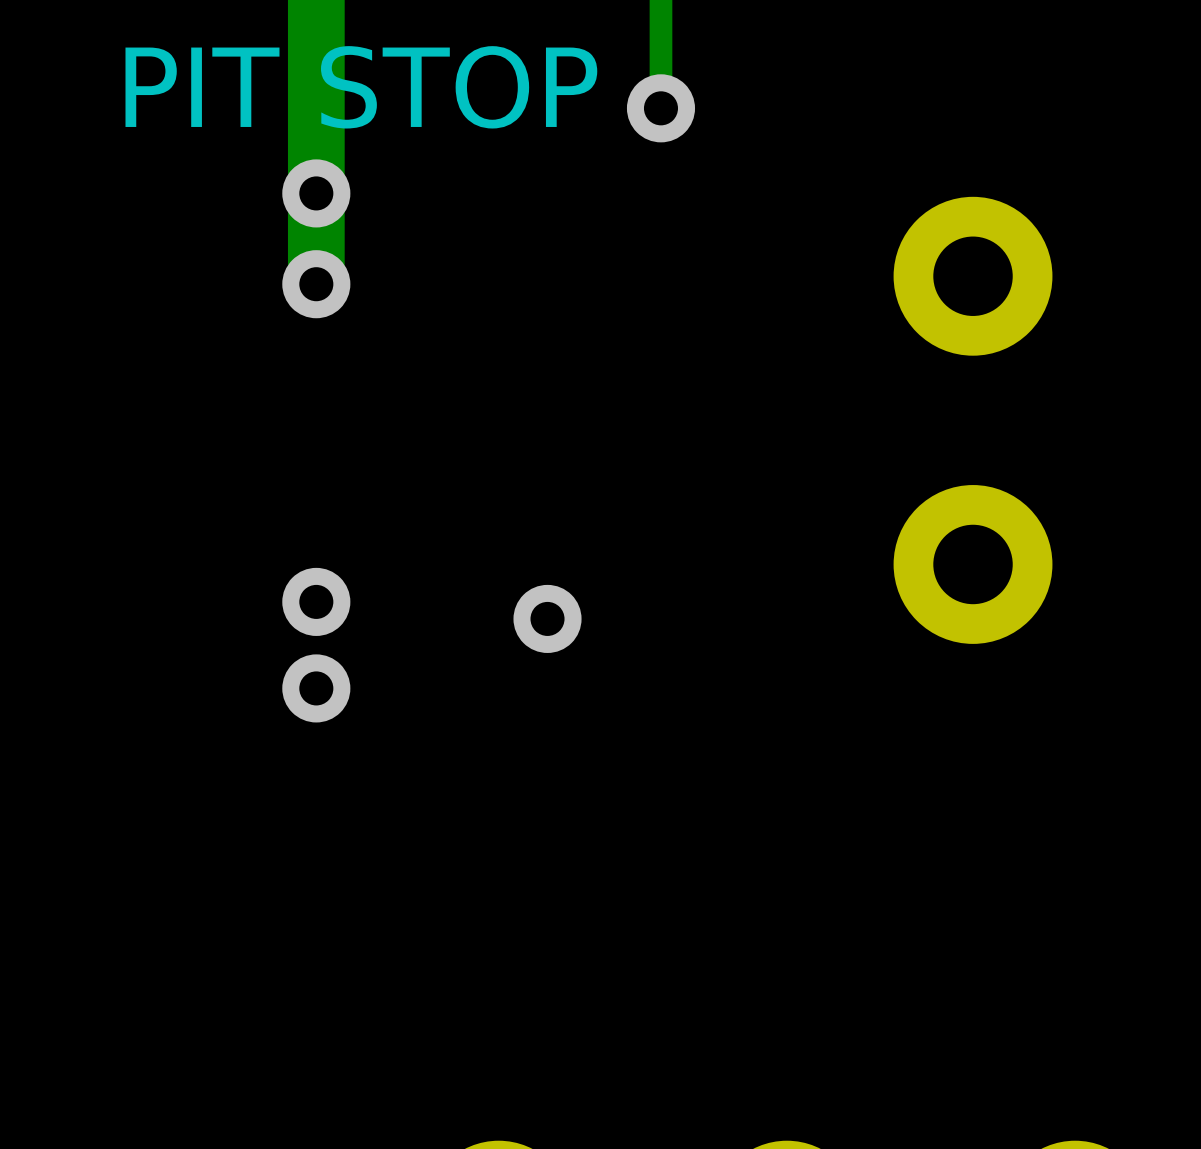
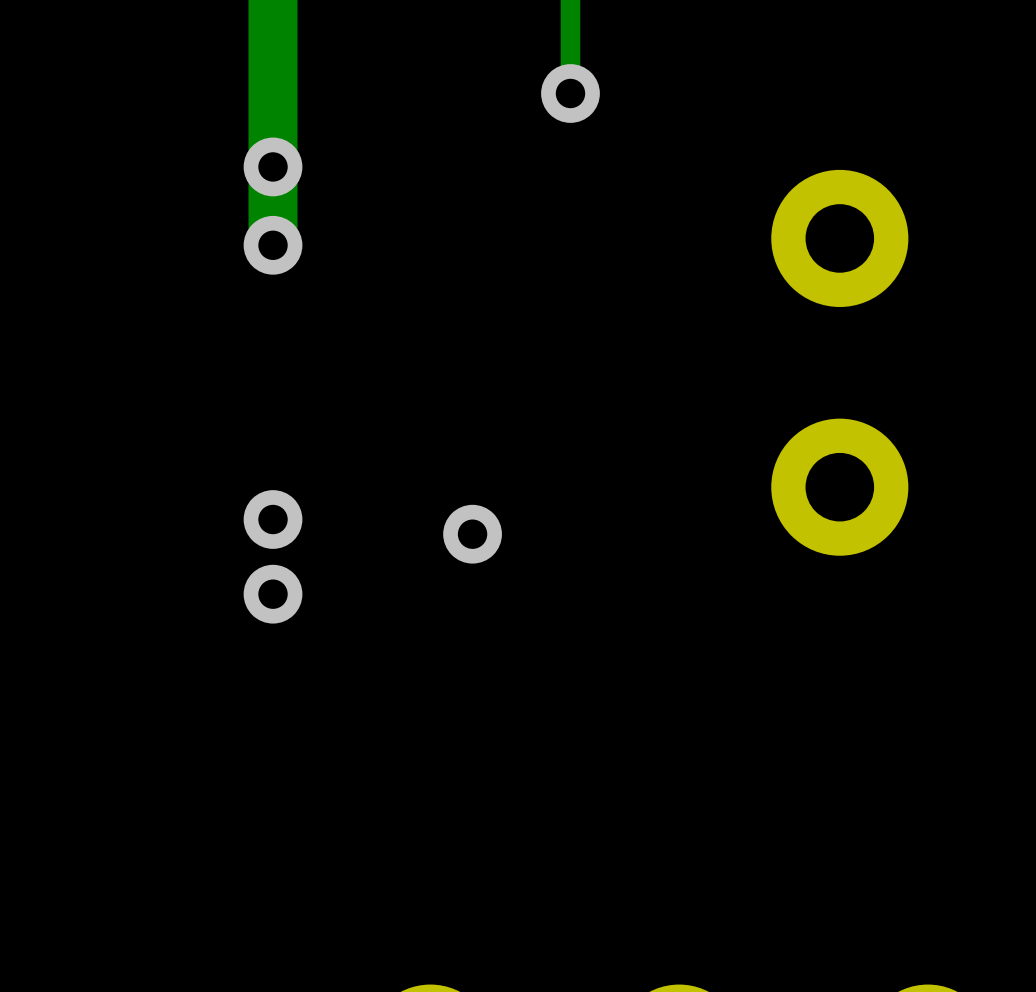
text: PIT STOP (361, 87) -> none

